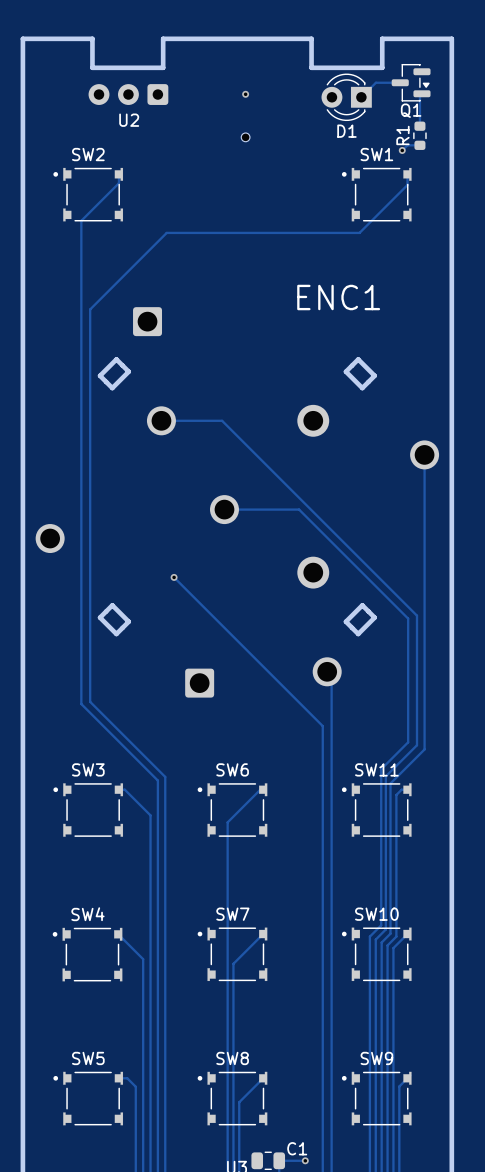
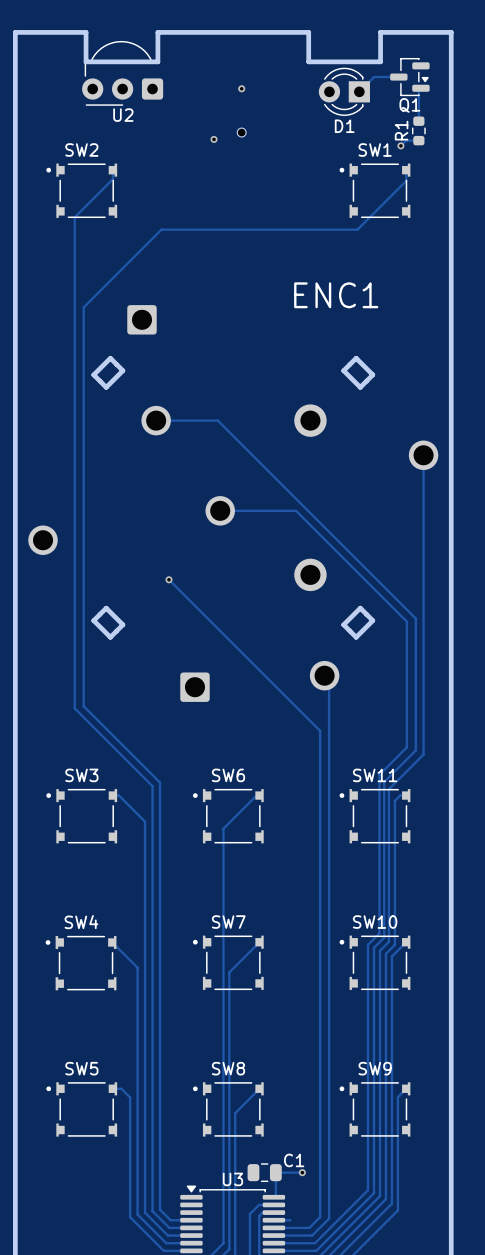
U2 footprint: [88, 84, 169, 105] -> [82, 40, 164, 106]
via: none -> (214, 139)

